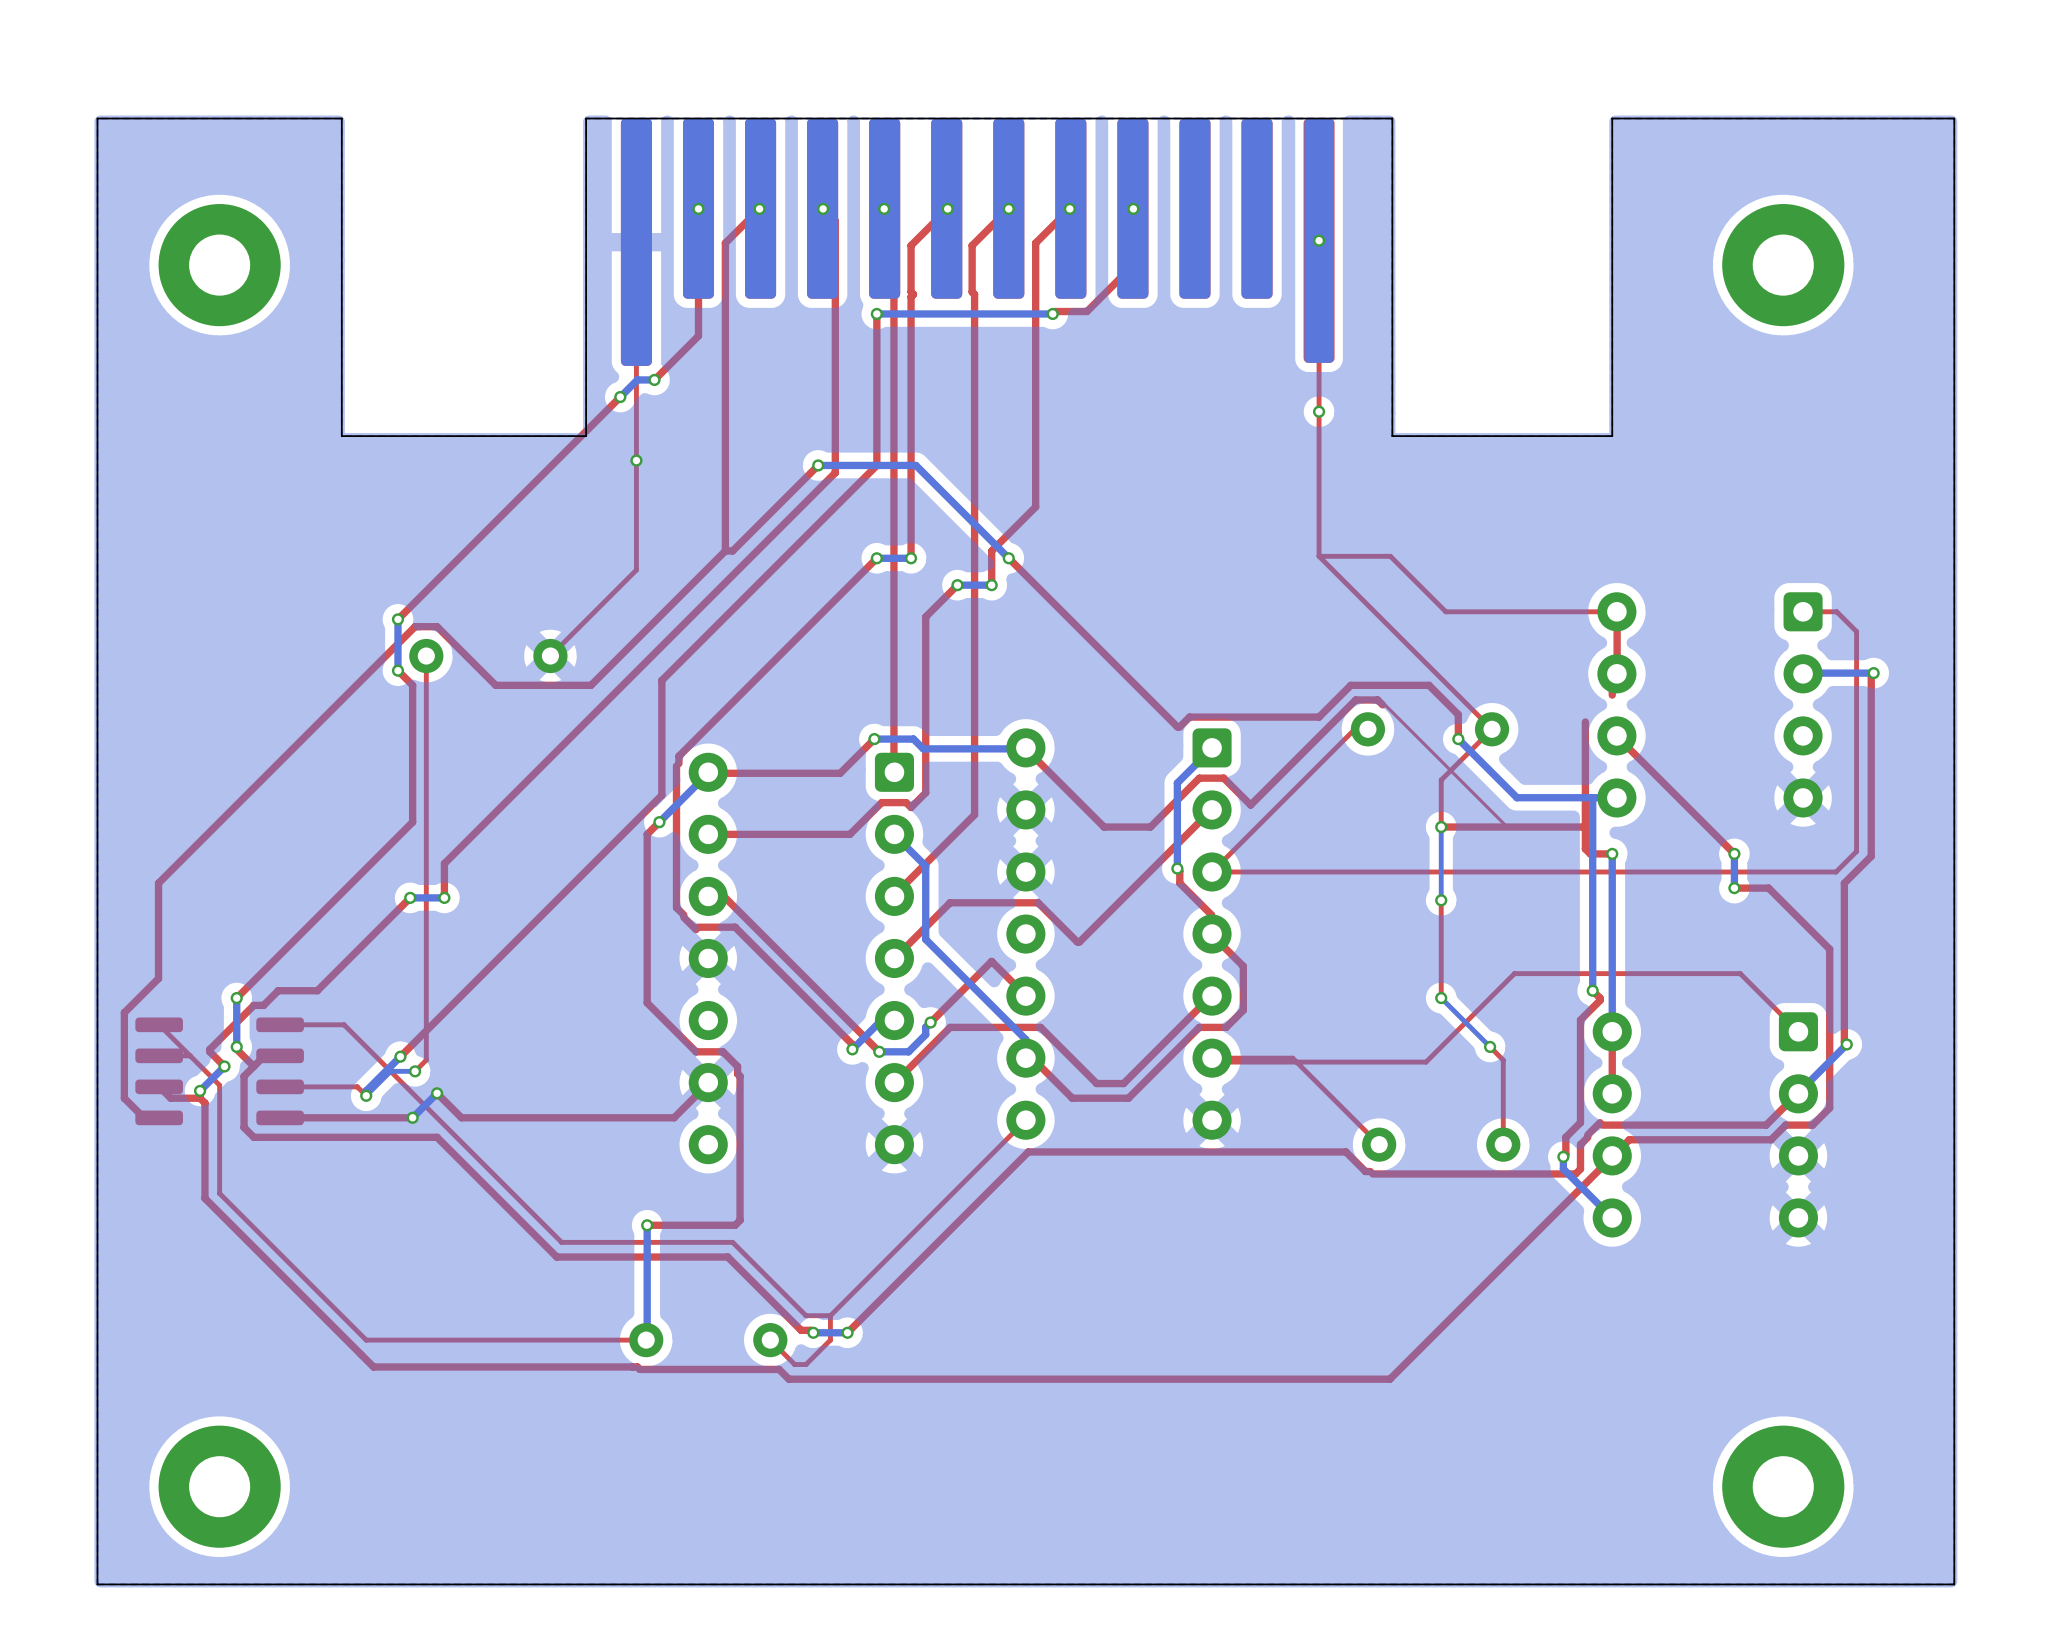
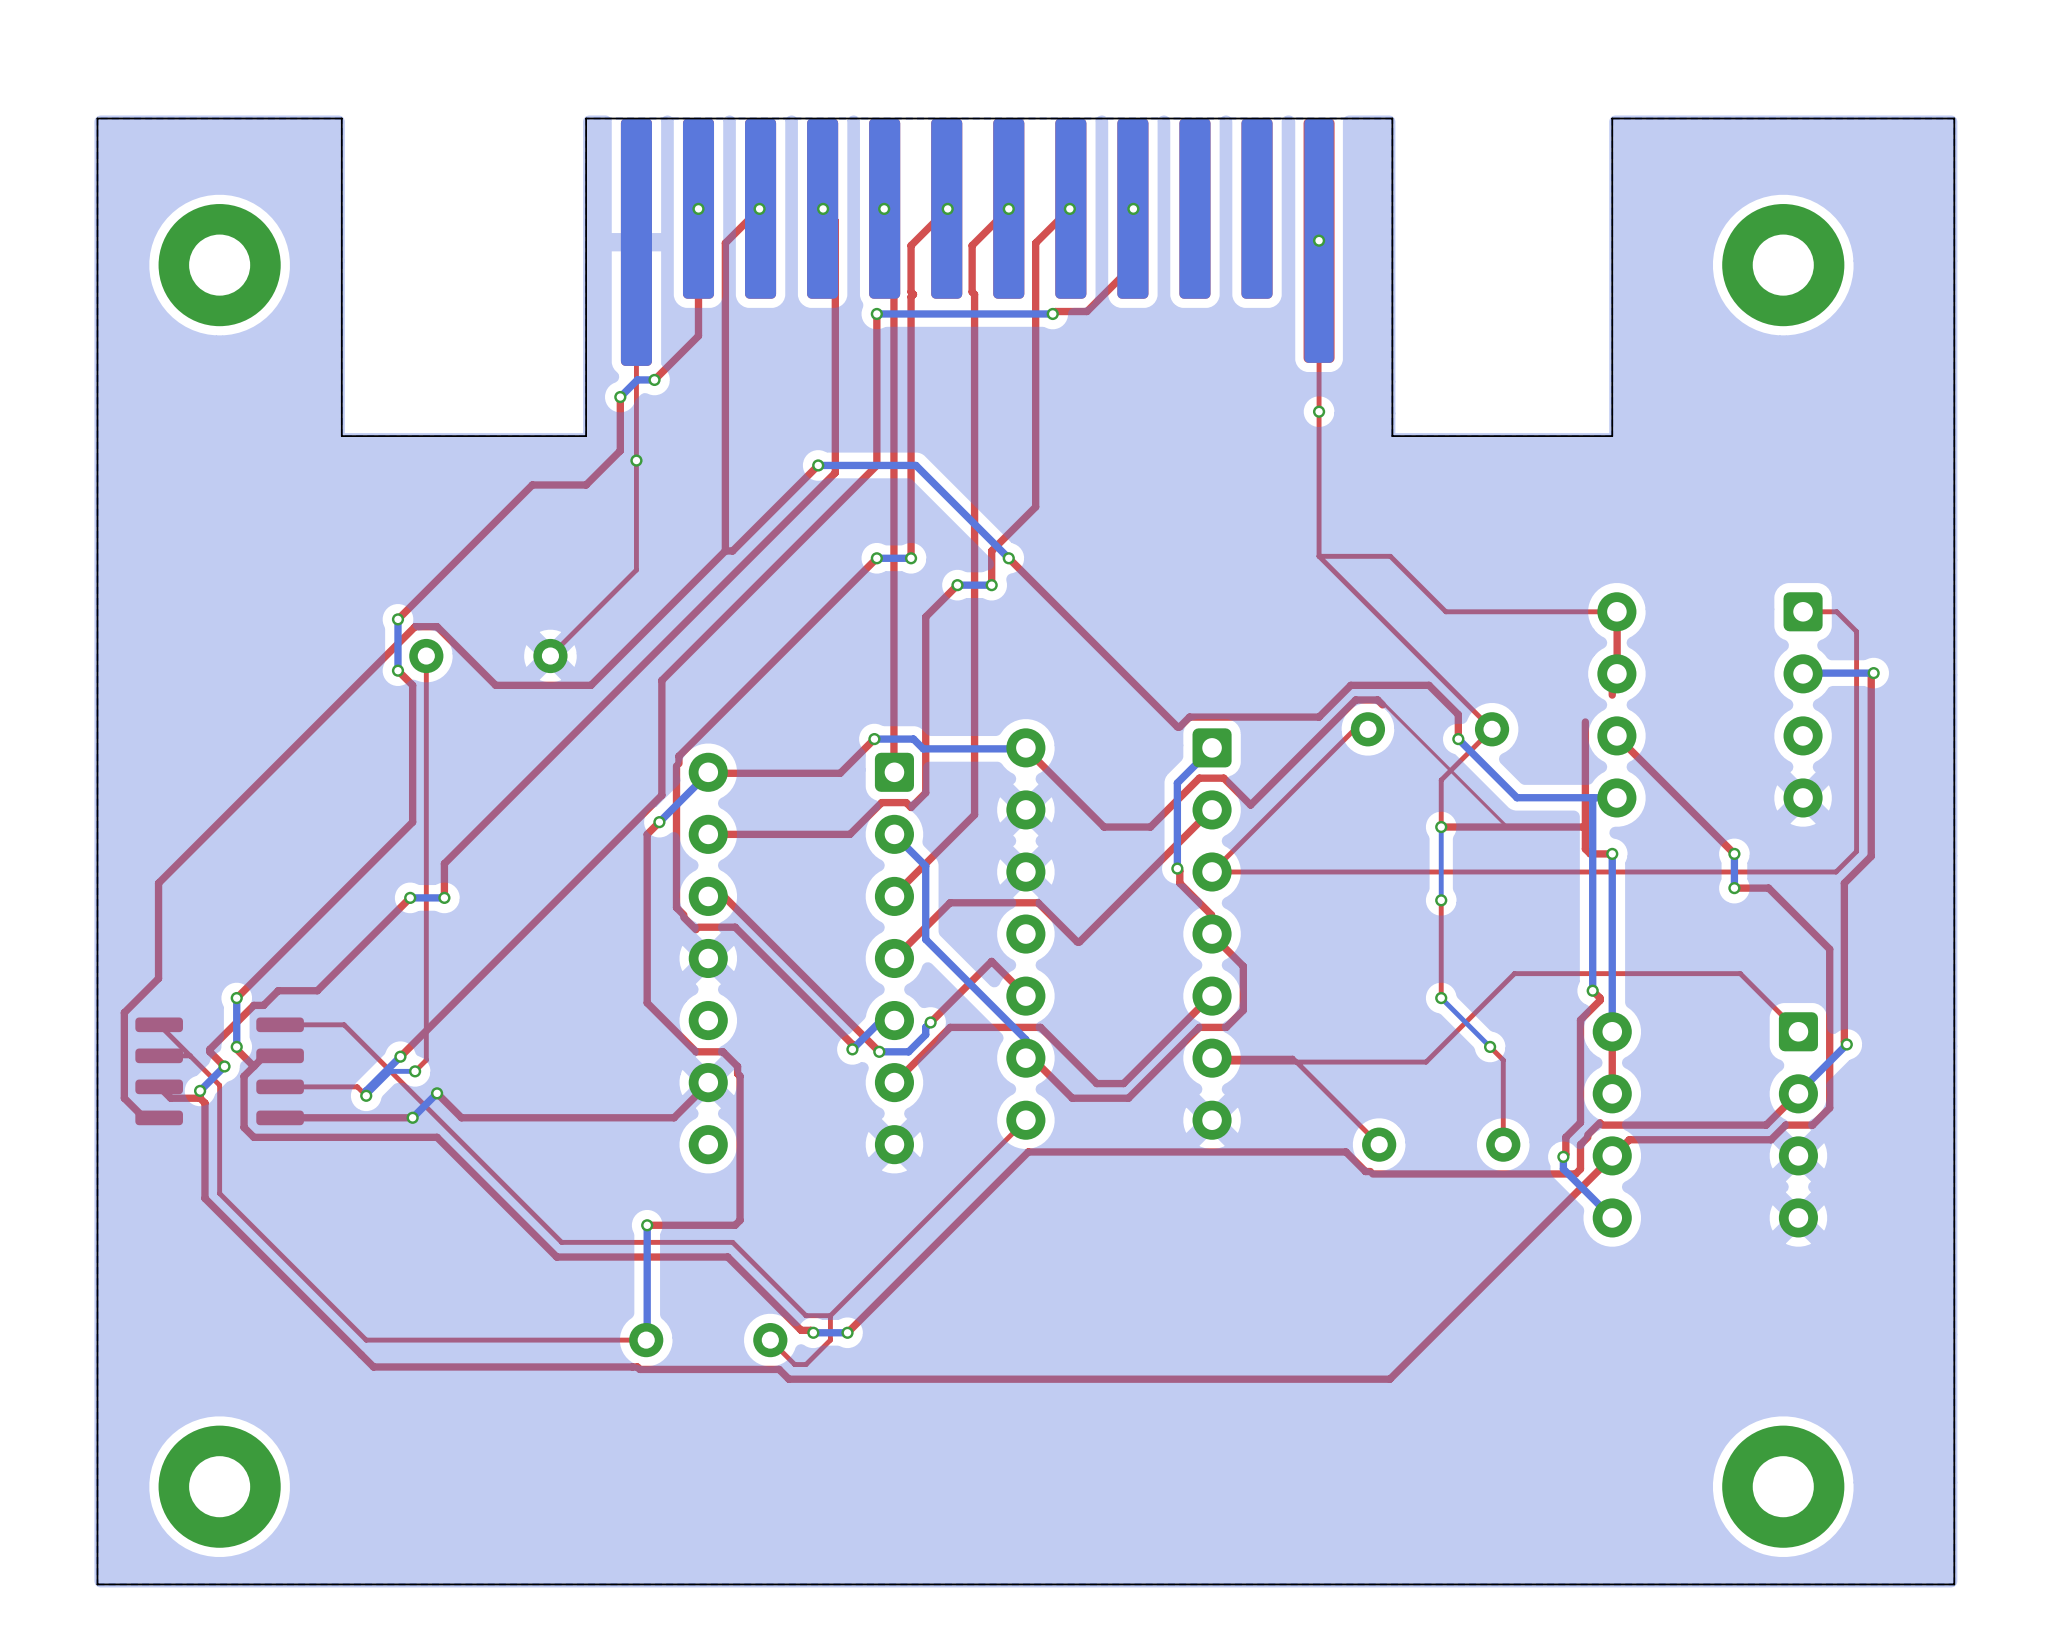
top track: (620, 397) (532, 484) -> (620, 397) (620, 450) (586, 484) (532, 484)

